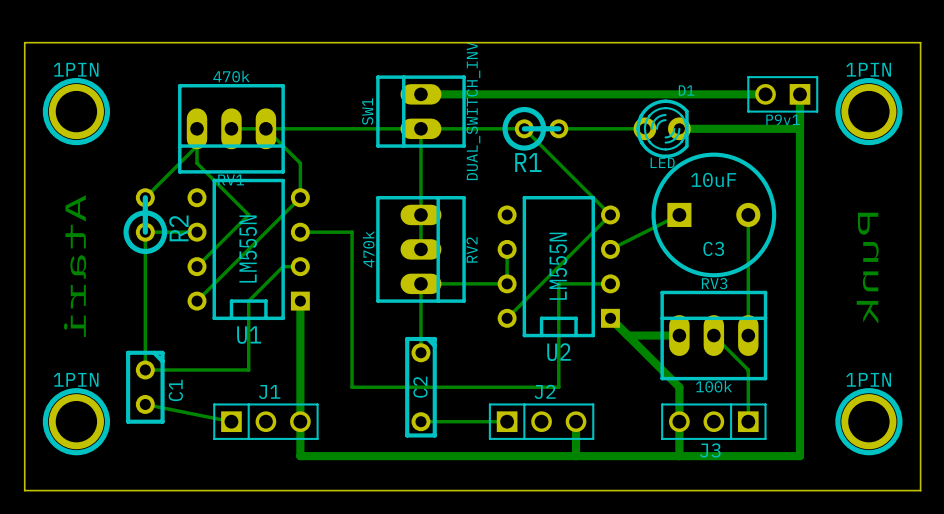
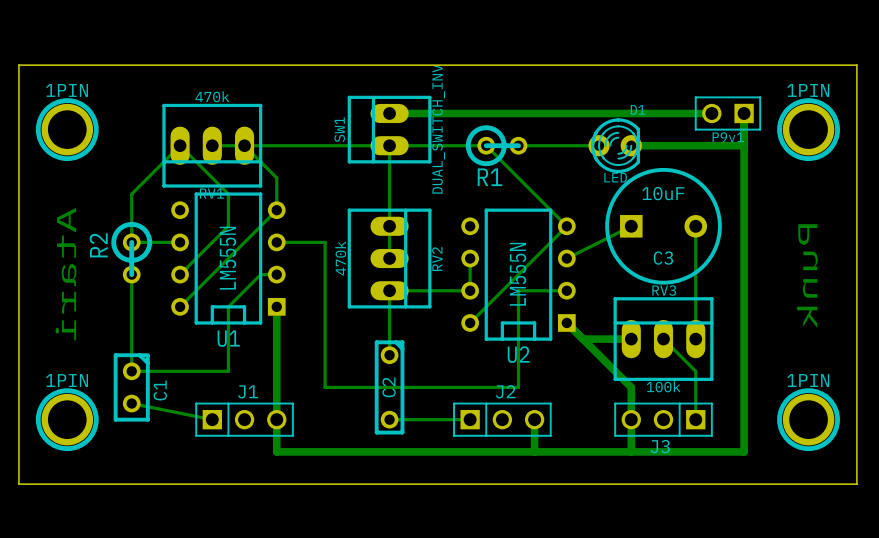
bottom track: (197, 128) (197, 163) (248, 214) -> (131, 242) (131, 194) (180, 145) (228, 194) (228, 226)
bottom track: (197, 146) (145, 197) -> none
R2 rotation: 0° (145, 221) -> 180° (131, 252)

